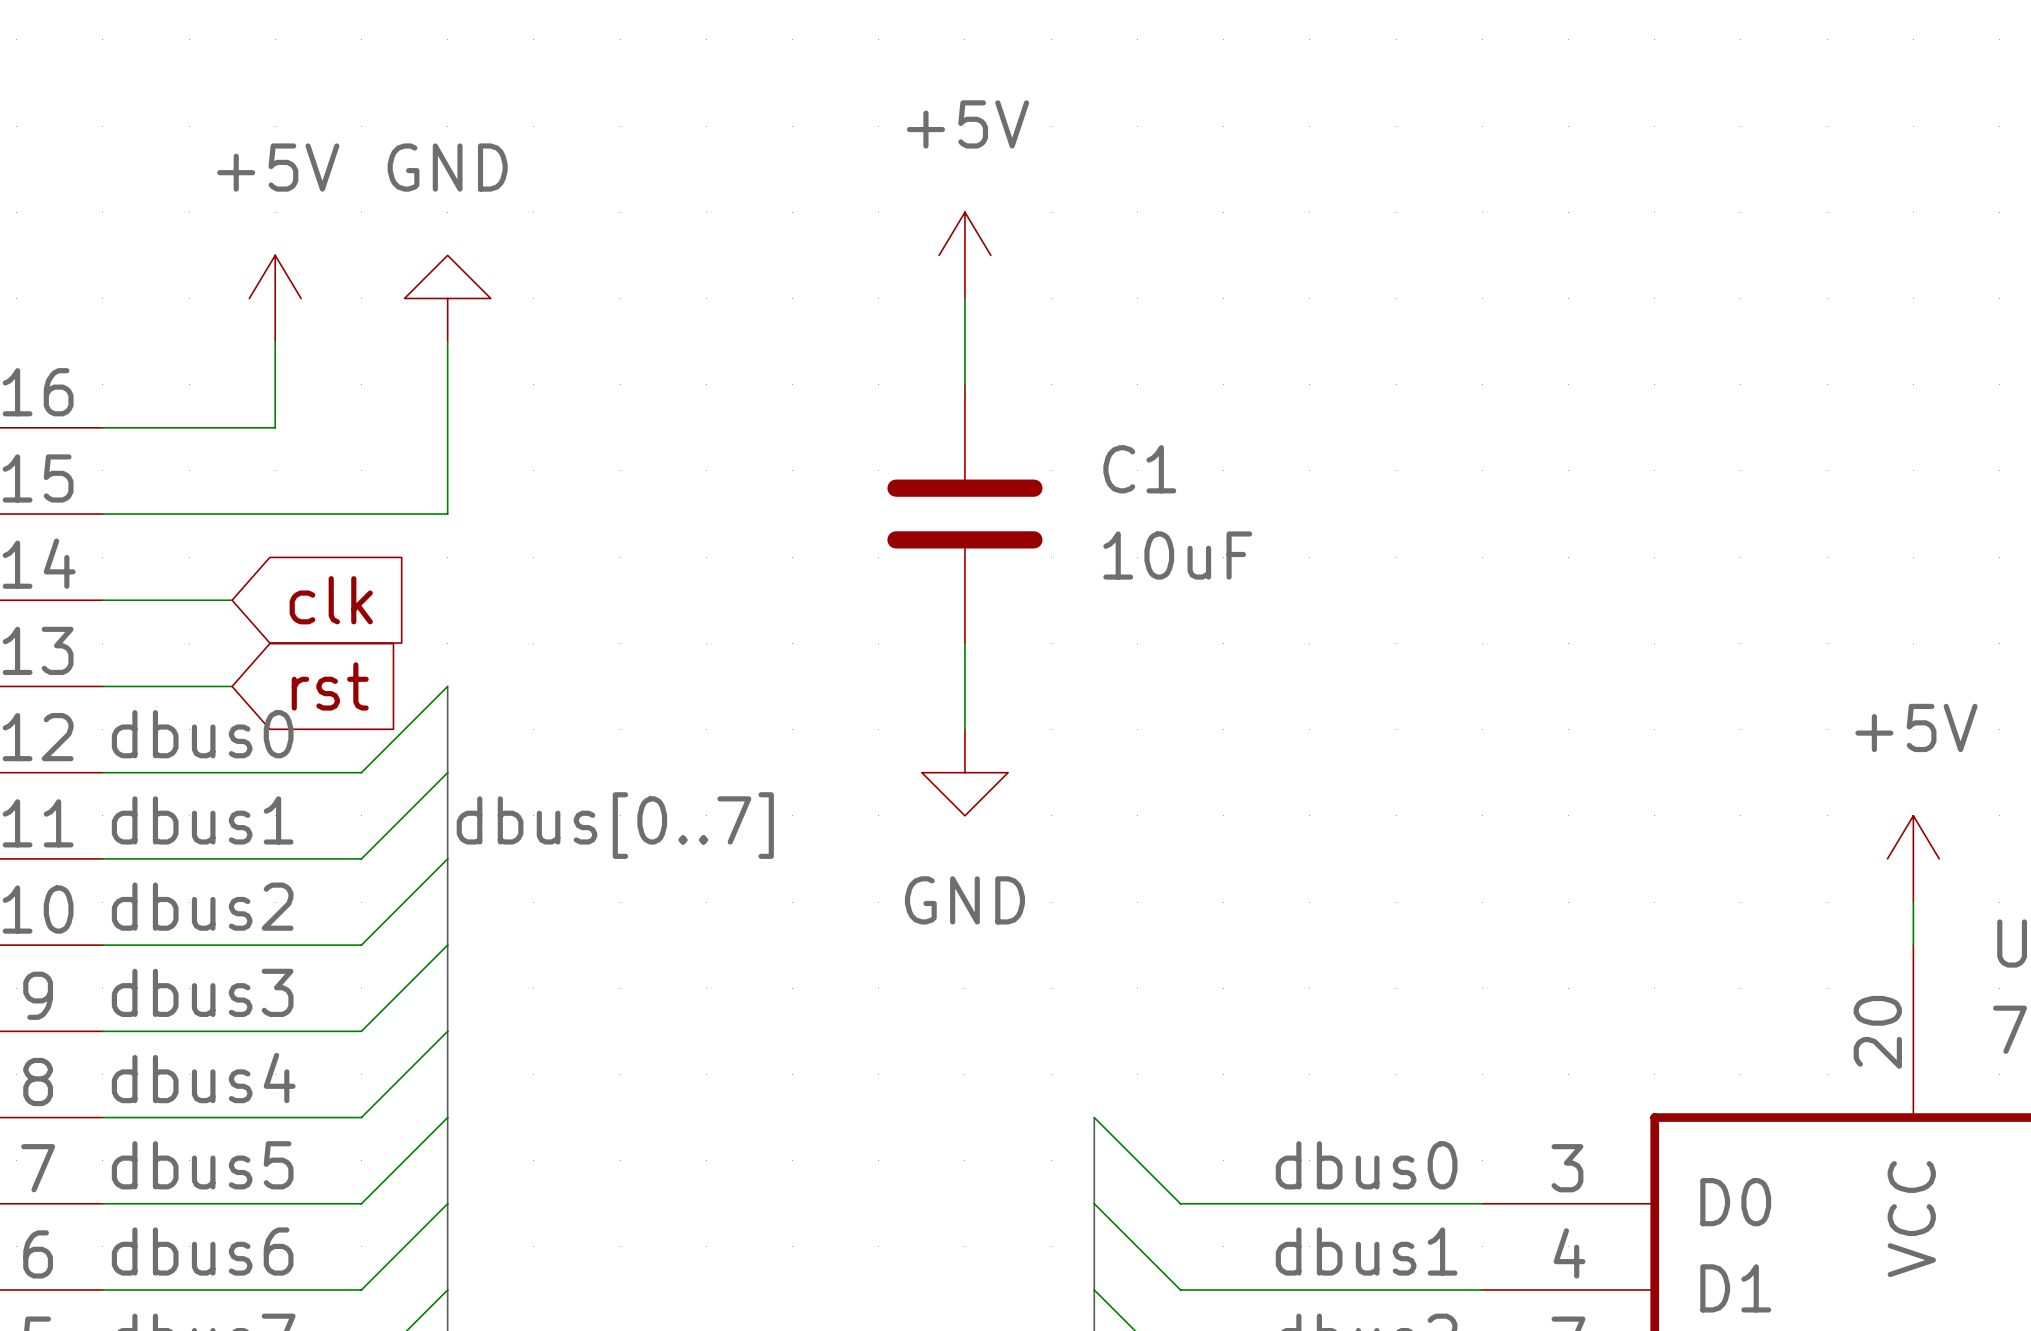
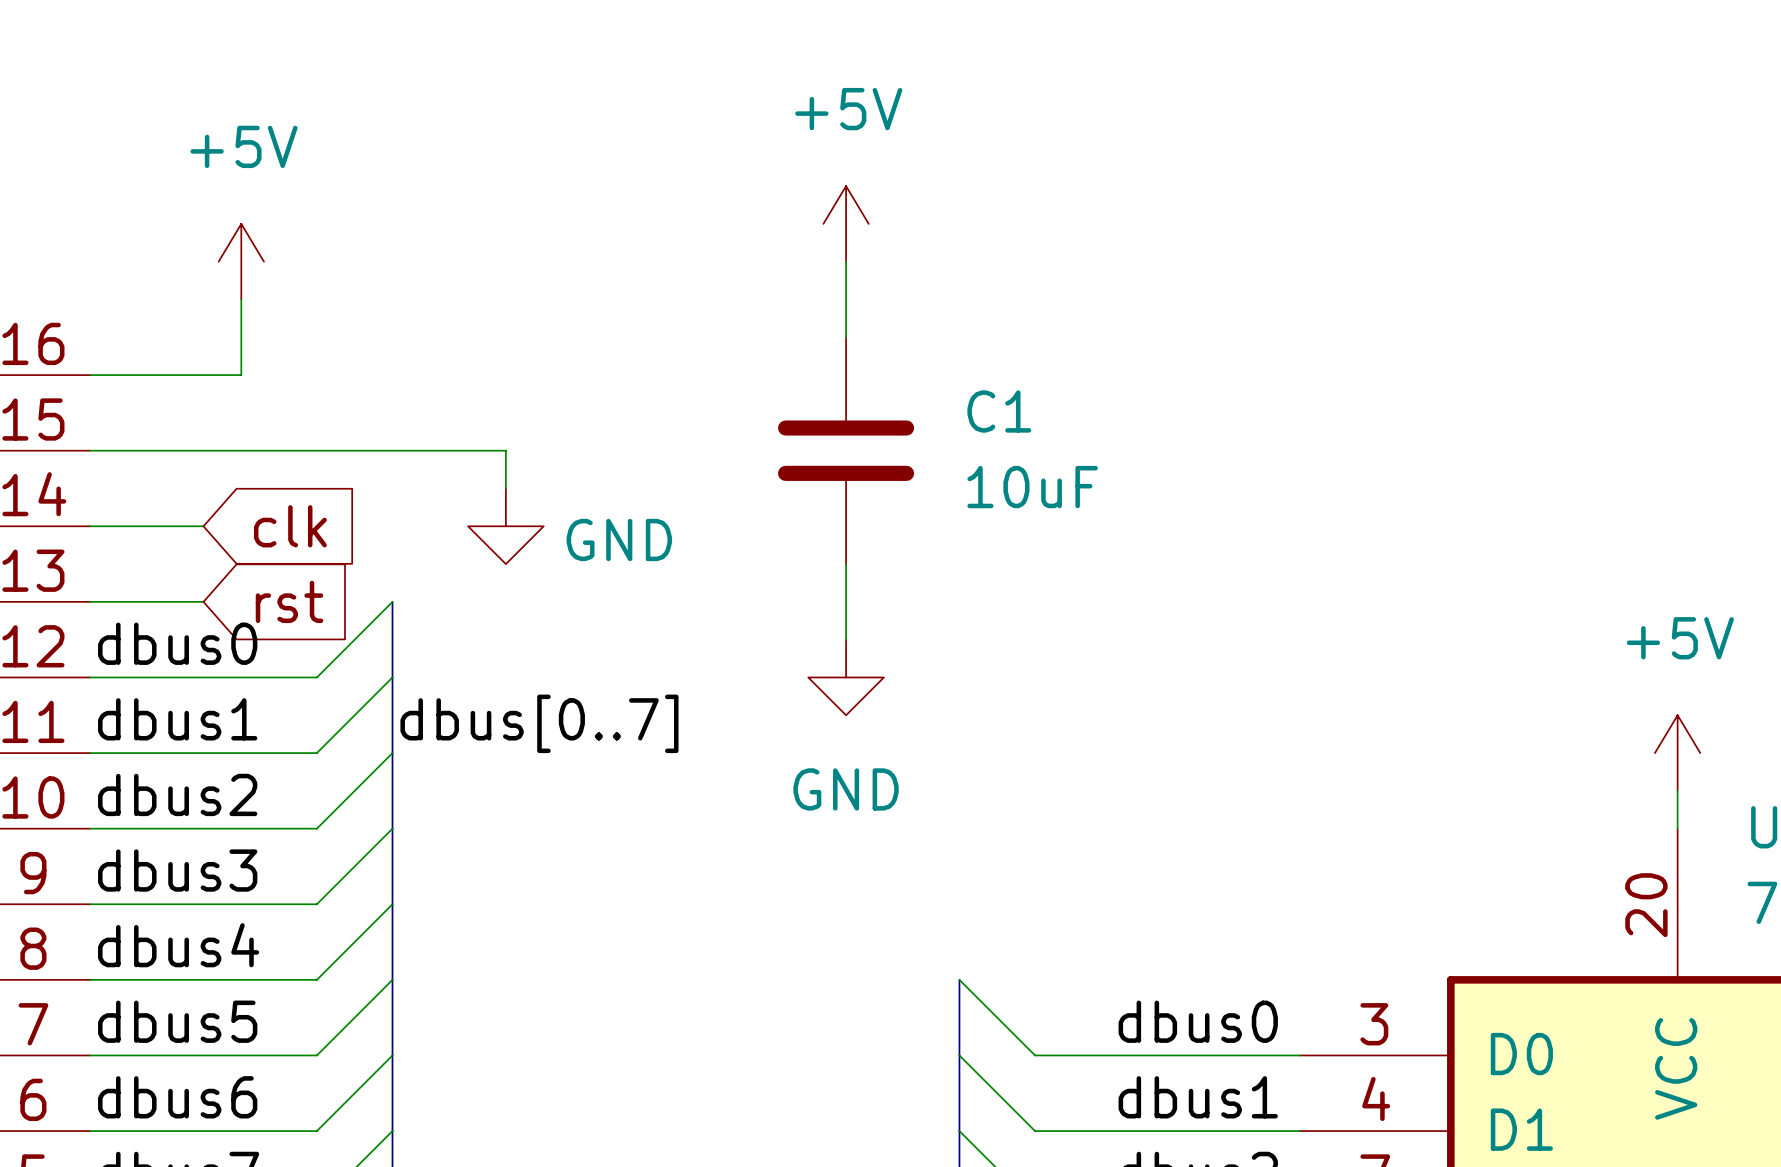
power symbol text position: GND (447, 167) -> GND (619, 539)
power symbol rotation: 0° (447, 298) -> 180° (505, 526)
power symbol position: GND (447, 298) -> GND (505, 526)
wire: (447, 341) (447, 514) -> (505, 488) (505, 450) (392, 450)

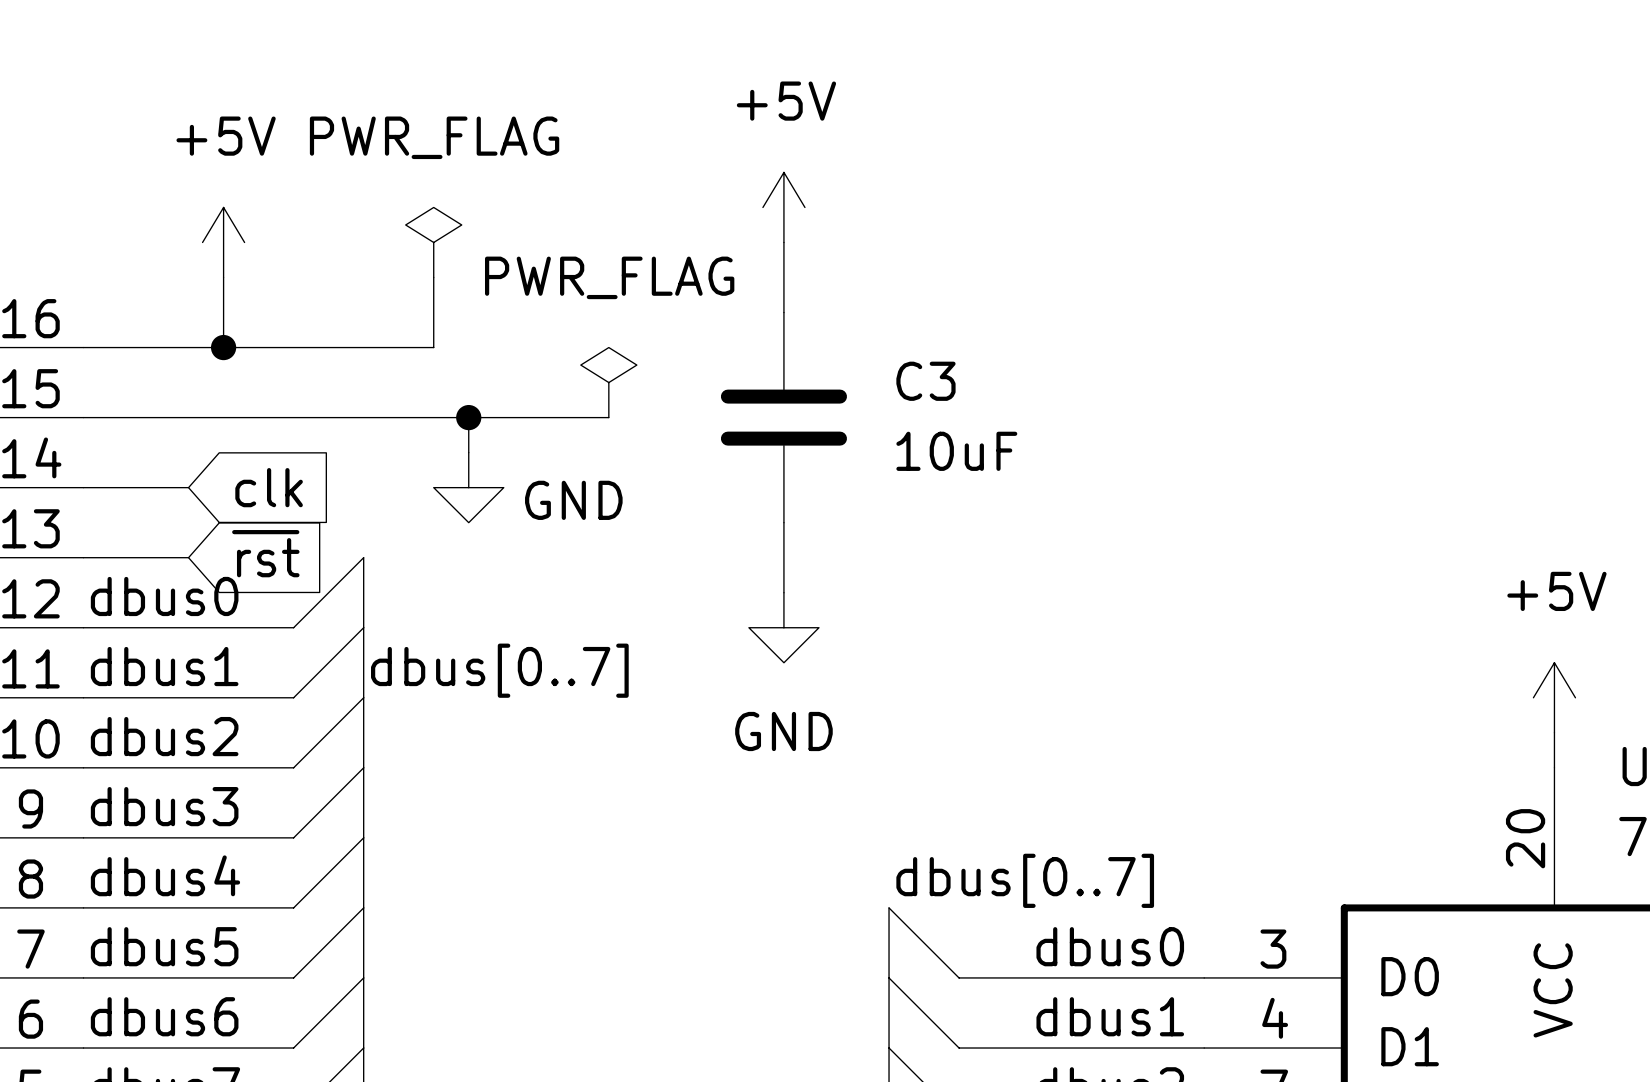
power symbol: none -> PWR_FLAG (433, 242)
wire: none -> (433, 277) (433, 347) (223, 347)
junction: none -> (223, 347)
C1 name: C1 (999, 411) -> C3 (925, 381)
power symbol: none -> PWR_FLAG (608, 382)
wire: none -> (468, 417) (608, 417)
junction: none -> (468, 417)
global label: rst (289, 601) -> ~{rst} (265, 553)
label: none -> dbus[0..7] (1025, 880)

